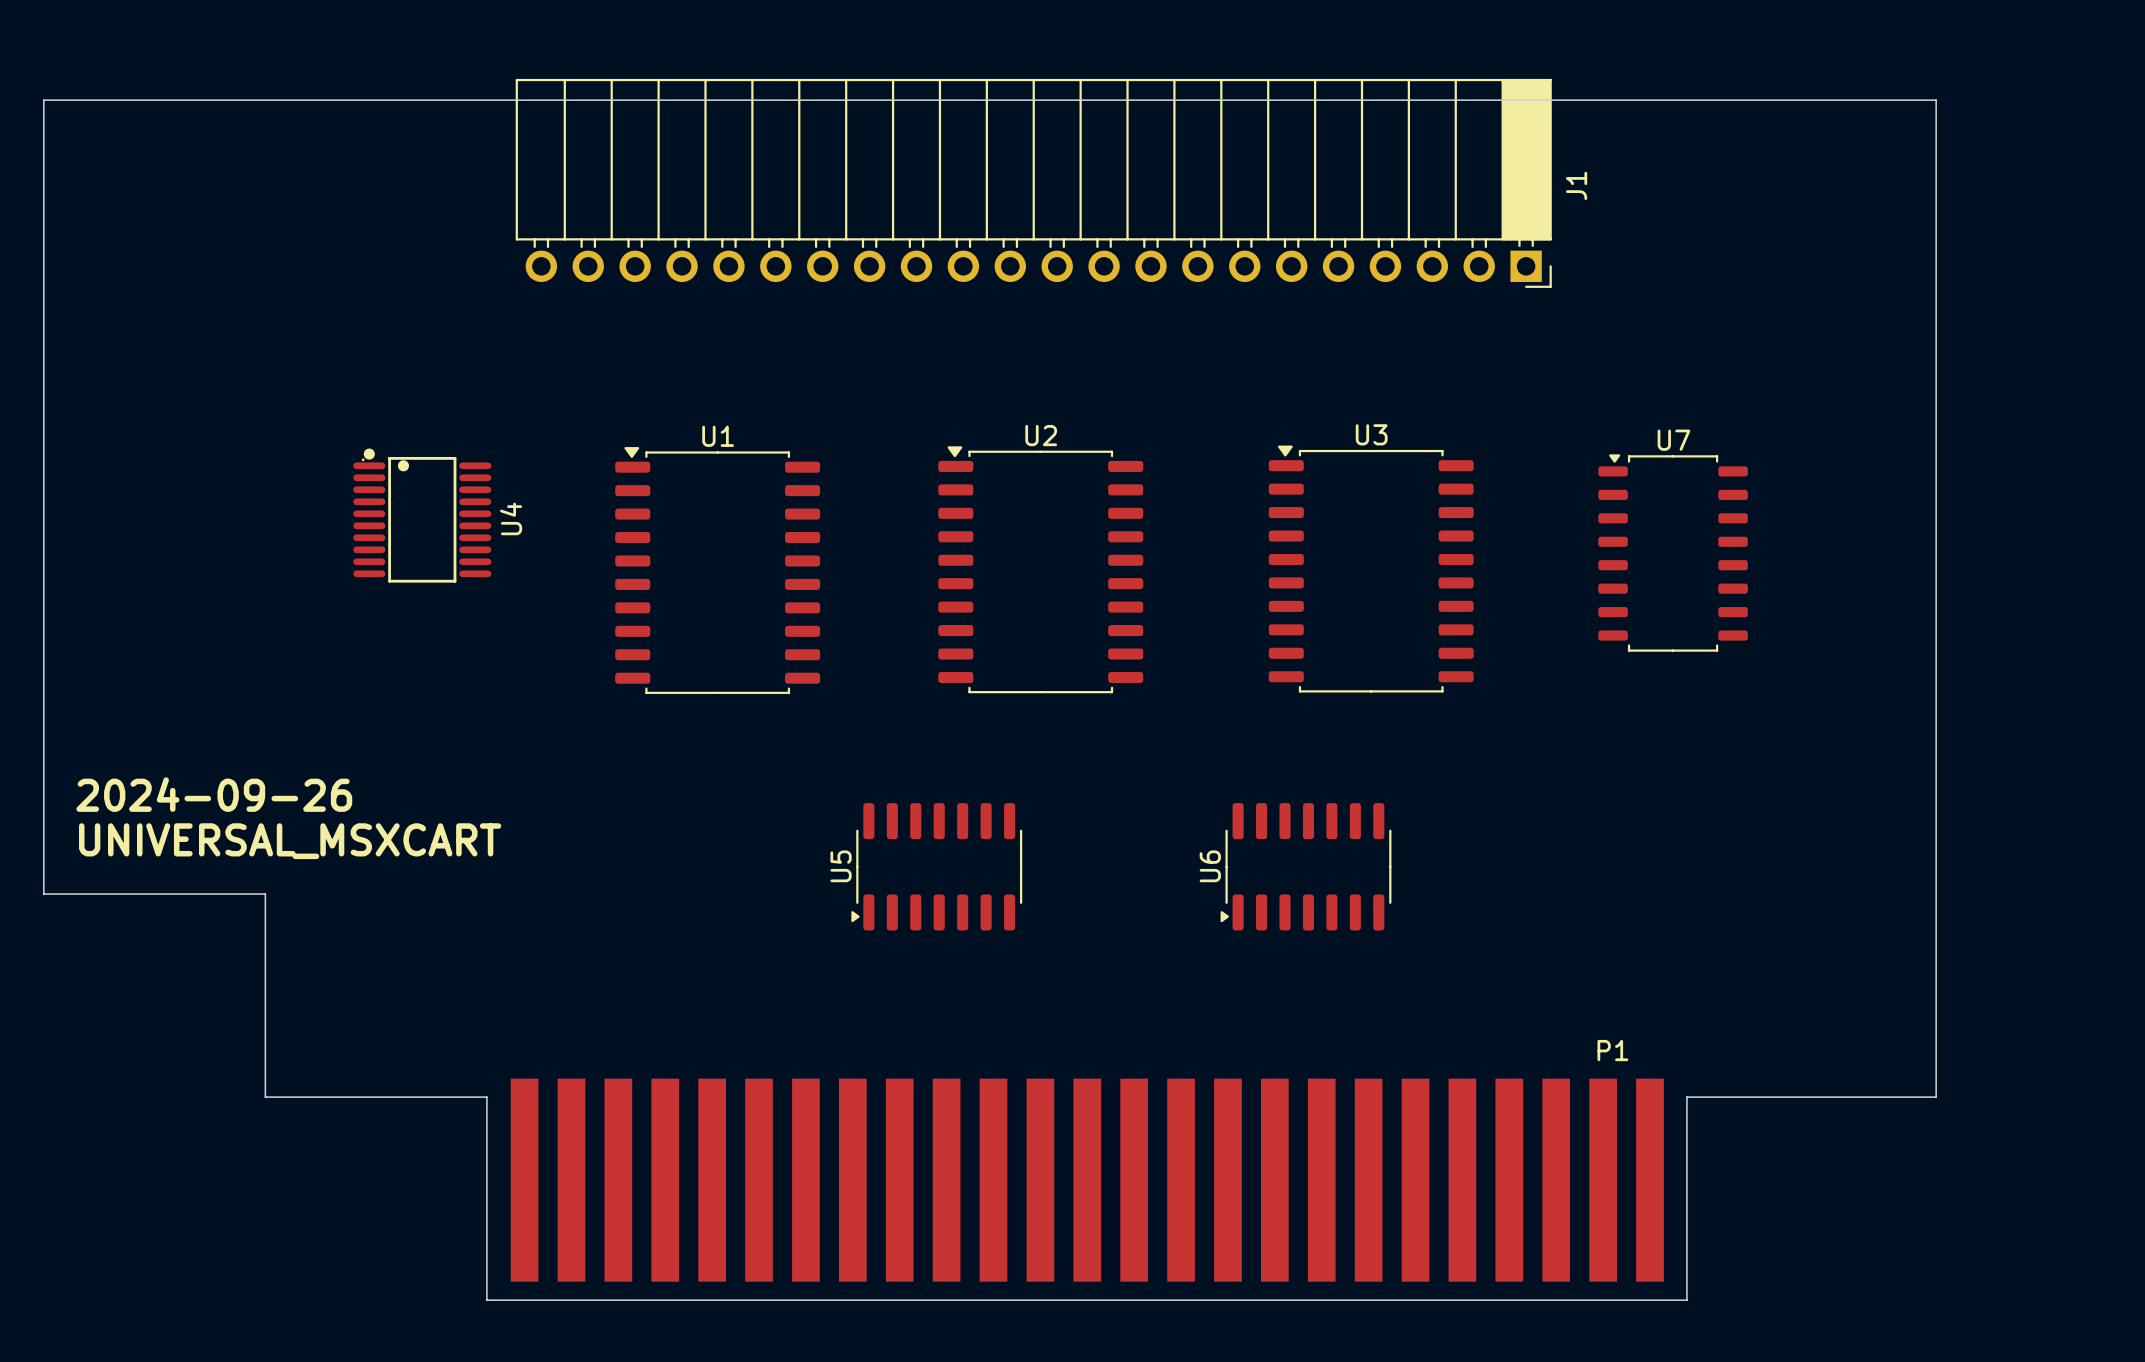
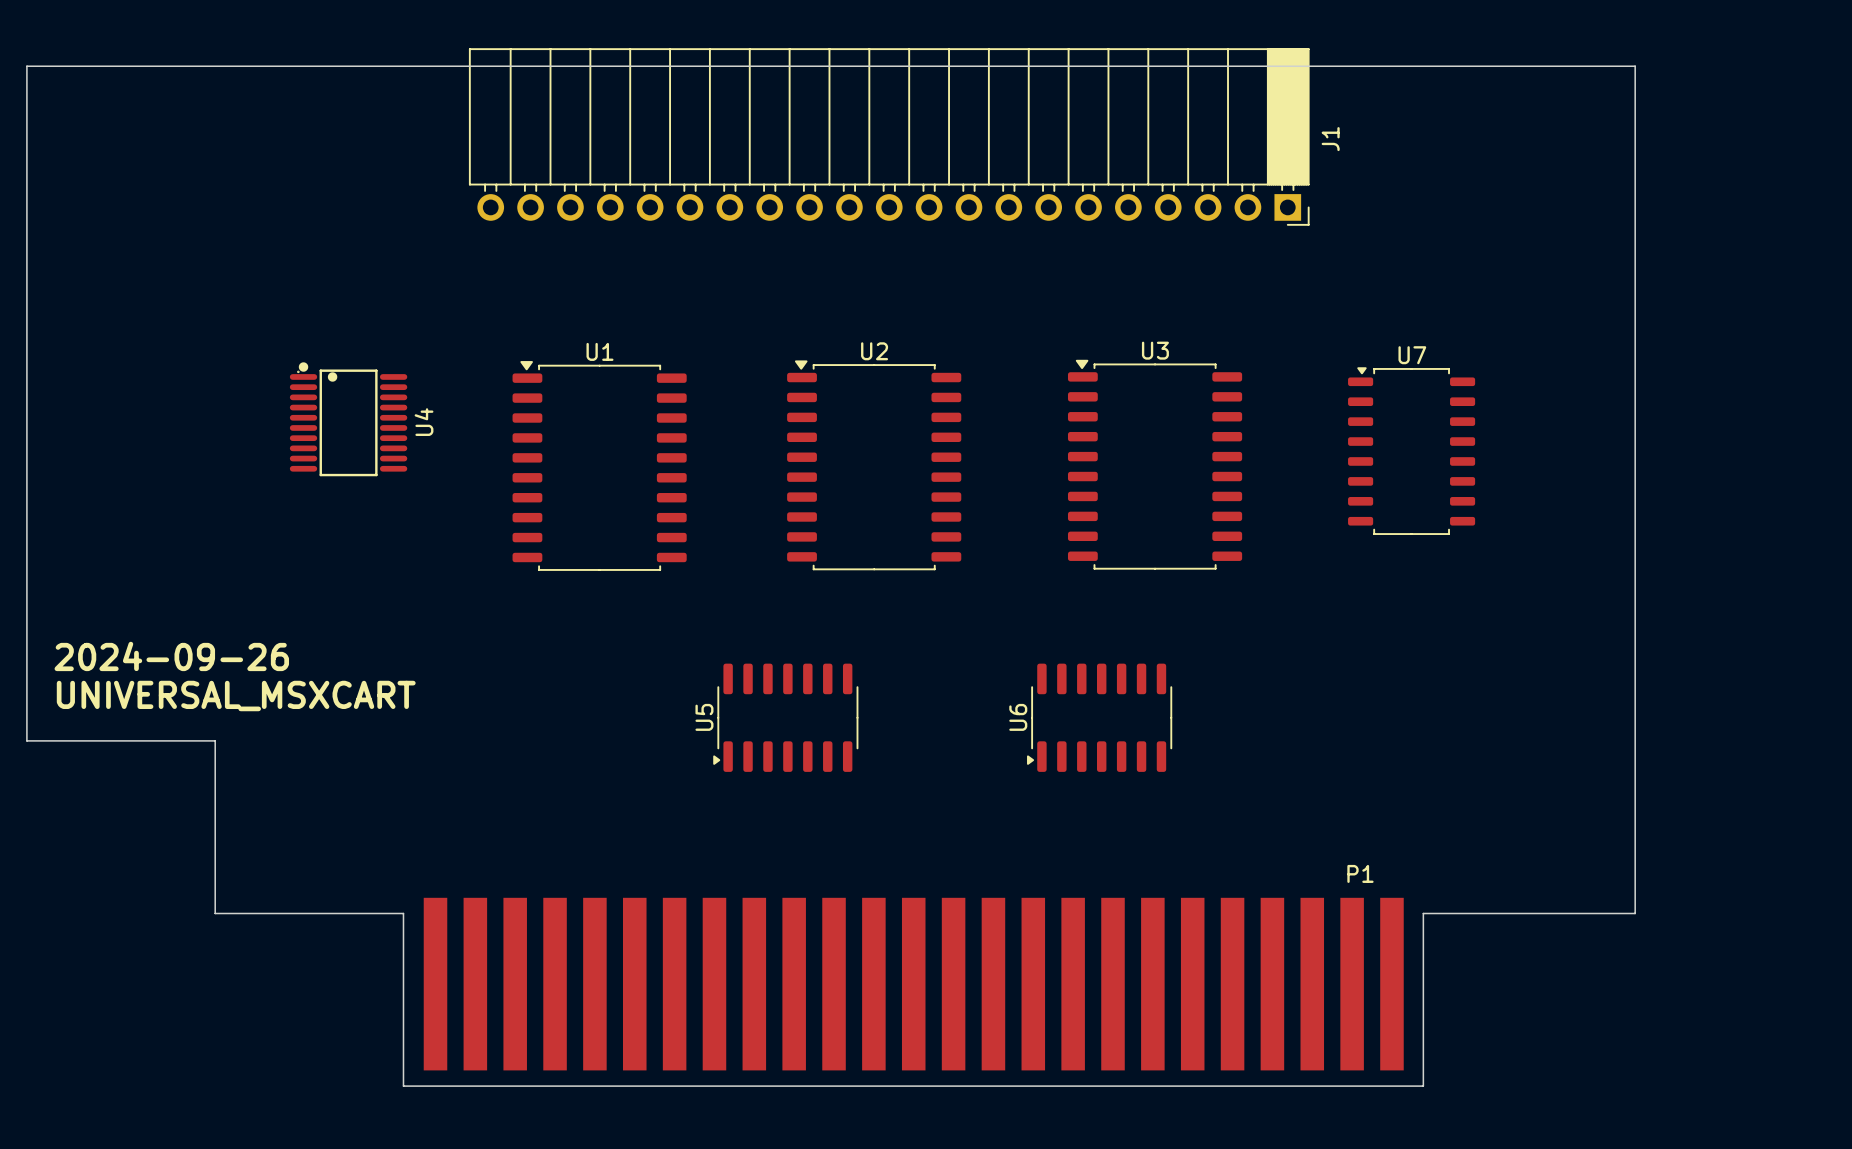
J1 footprint: [515, 78, 1552, 288] -> [468, 48, 1310, 226]

